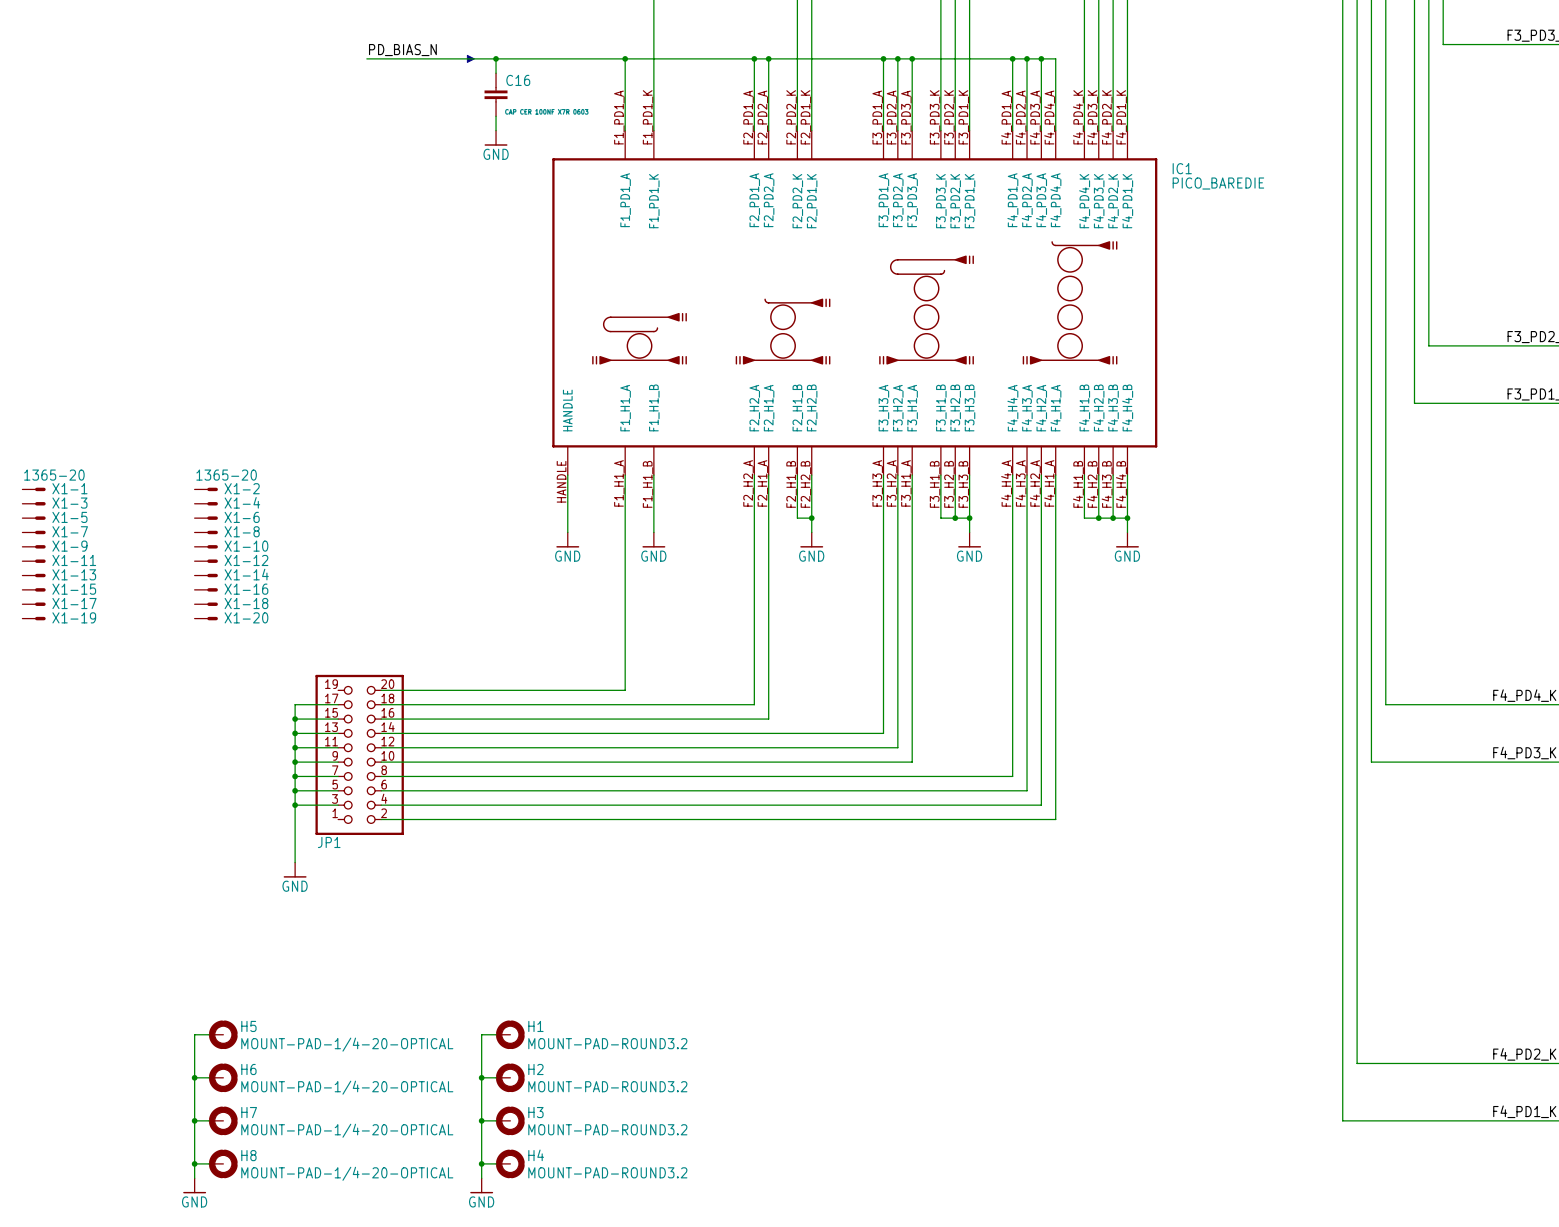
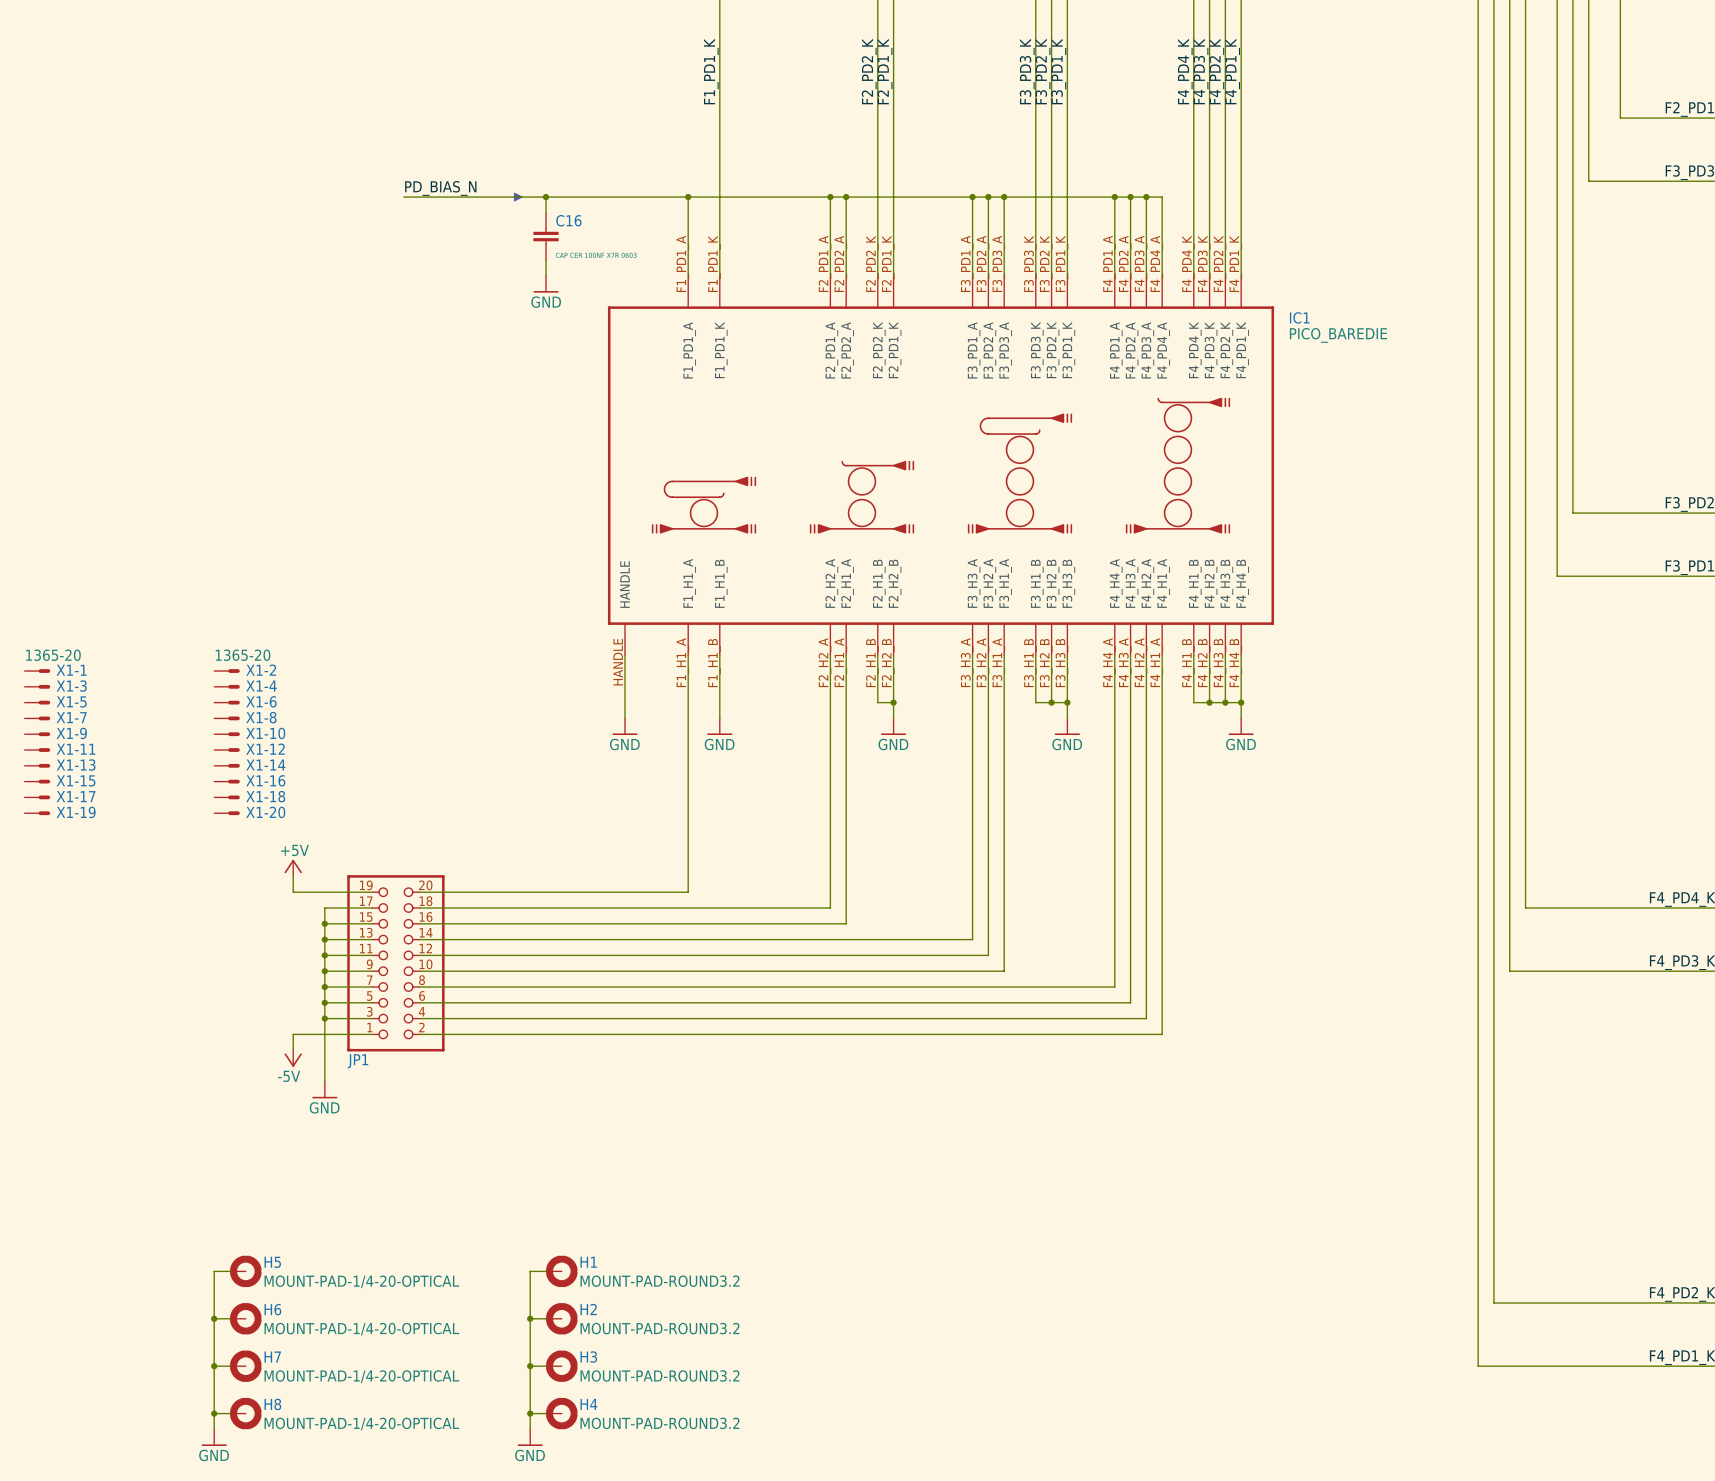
power symbol: none -> +5V (293, 868)
wire: none -> (293, 876) (293, 892) (372, 892)
wire: none -> (372, 1034) (293, 1034) (293, 1050)
power symbol: none -> -5V (293, 1058)

